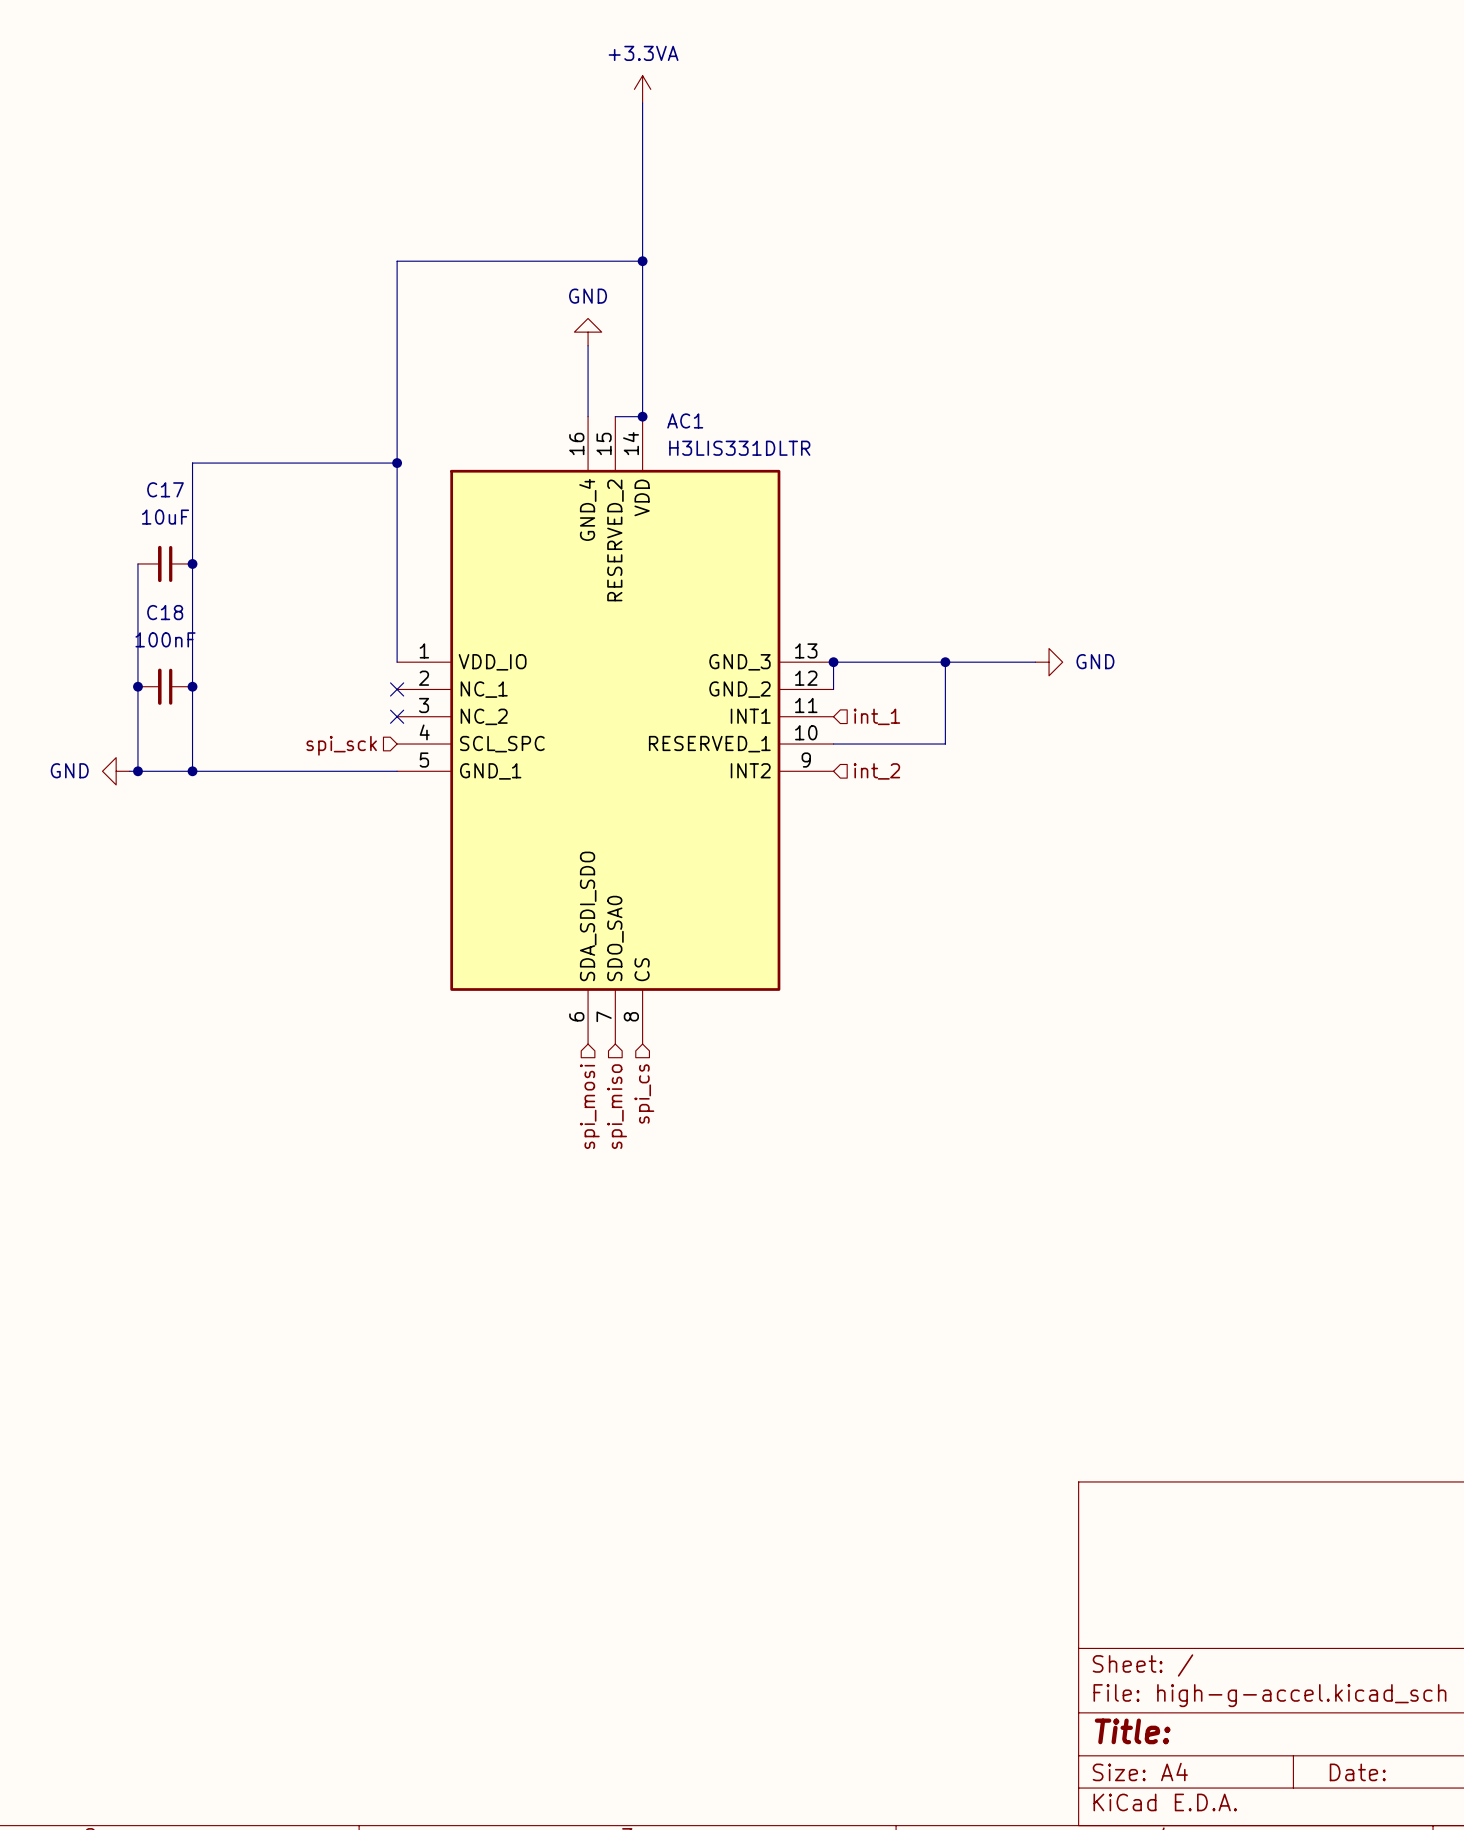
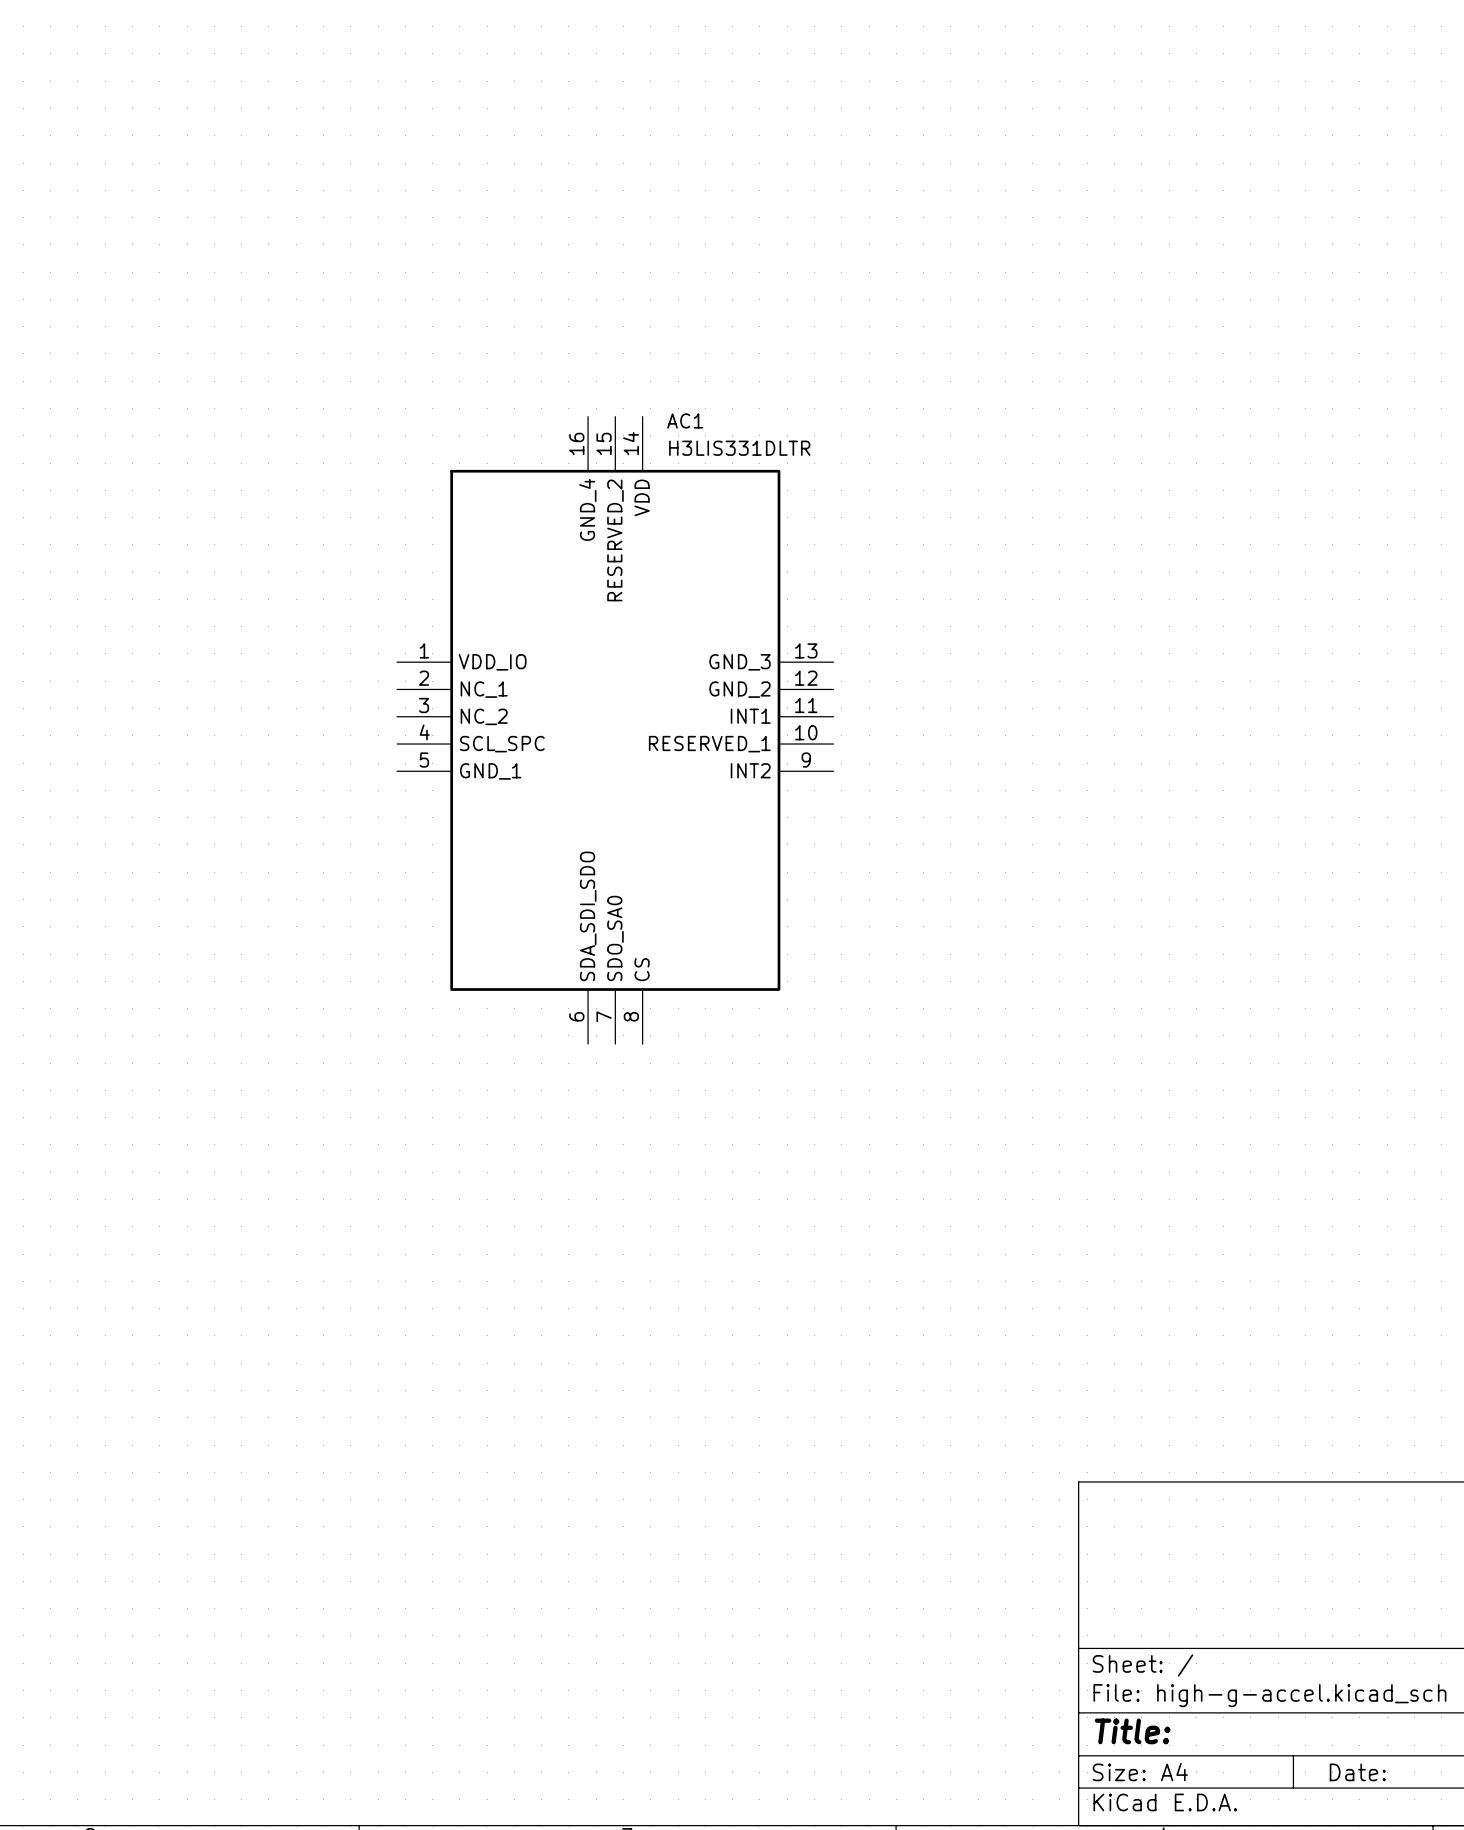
power symbol: +3.3VA (642, 89) -> none
wire: (642, 102) (642, 416) (615, 416) -> none
wire: (642, 261) (397, 261) (397, 662) -> none
junction: (642, 261) -> none
power symbol: GND (588, 332) -> none
wire: (588, 345) (588, 416) -> none
junction: (642, 416) -> none
wire: (397, 463) (192, 463) (192, 771) -> none
junction: (397, 463) -> none
wire: (137, 563) (137, 771) -> none
C17: 10uF (165, 563) -> none
junction: (192, 563) -> none
junction: (833, 662) -> none
wire: (945, 662) (945, 744) (833, 744) -> none
junction: (945, 662) -> none
wire: (1035, 662) (833, 662) (833, 689) -> none
power symbol: GND (1049, 662) -> none
junction: (137, 686) -> none
C18: 100nF (165, 686) -> none
junction: (192, 686) -> none
no-connect mark: (397, 689) -> none
no-connect mark: (397, 716) -> none
hierarchical label: int_1 (876, 716) -> none
hierarchical label: spi_sck (341, 745) -> none
power symbol: GND (116, 771) -> none
wire: (129, 771) (397, 771) -> none
junction: (137, 771) -> none
junction: (192, 771) -> none
hierarchical label: int_2 (876, 771) -> none
hierarchical label: spi_cs (644, 1093) -> none
hierarchical label: spi_mosi (589, 1106) -> none
hierarchical label: spi_miso (617, 1106) -> none

